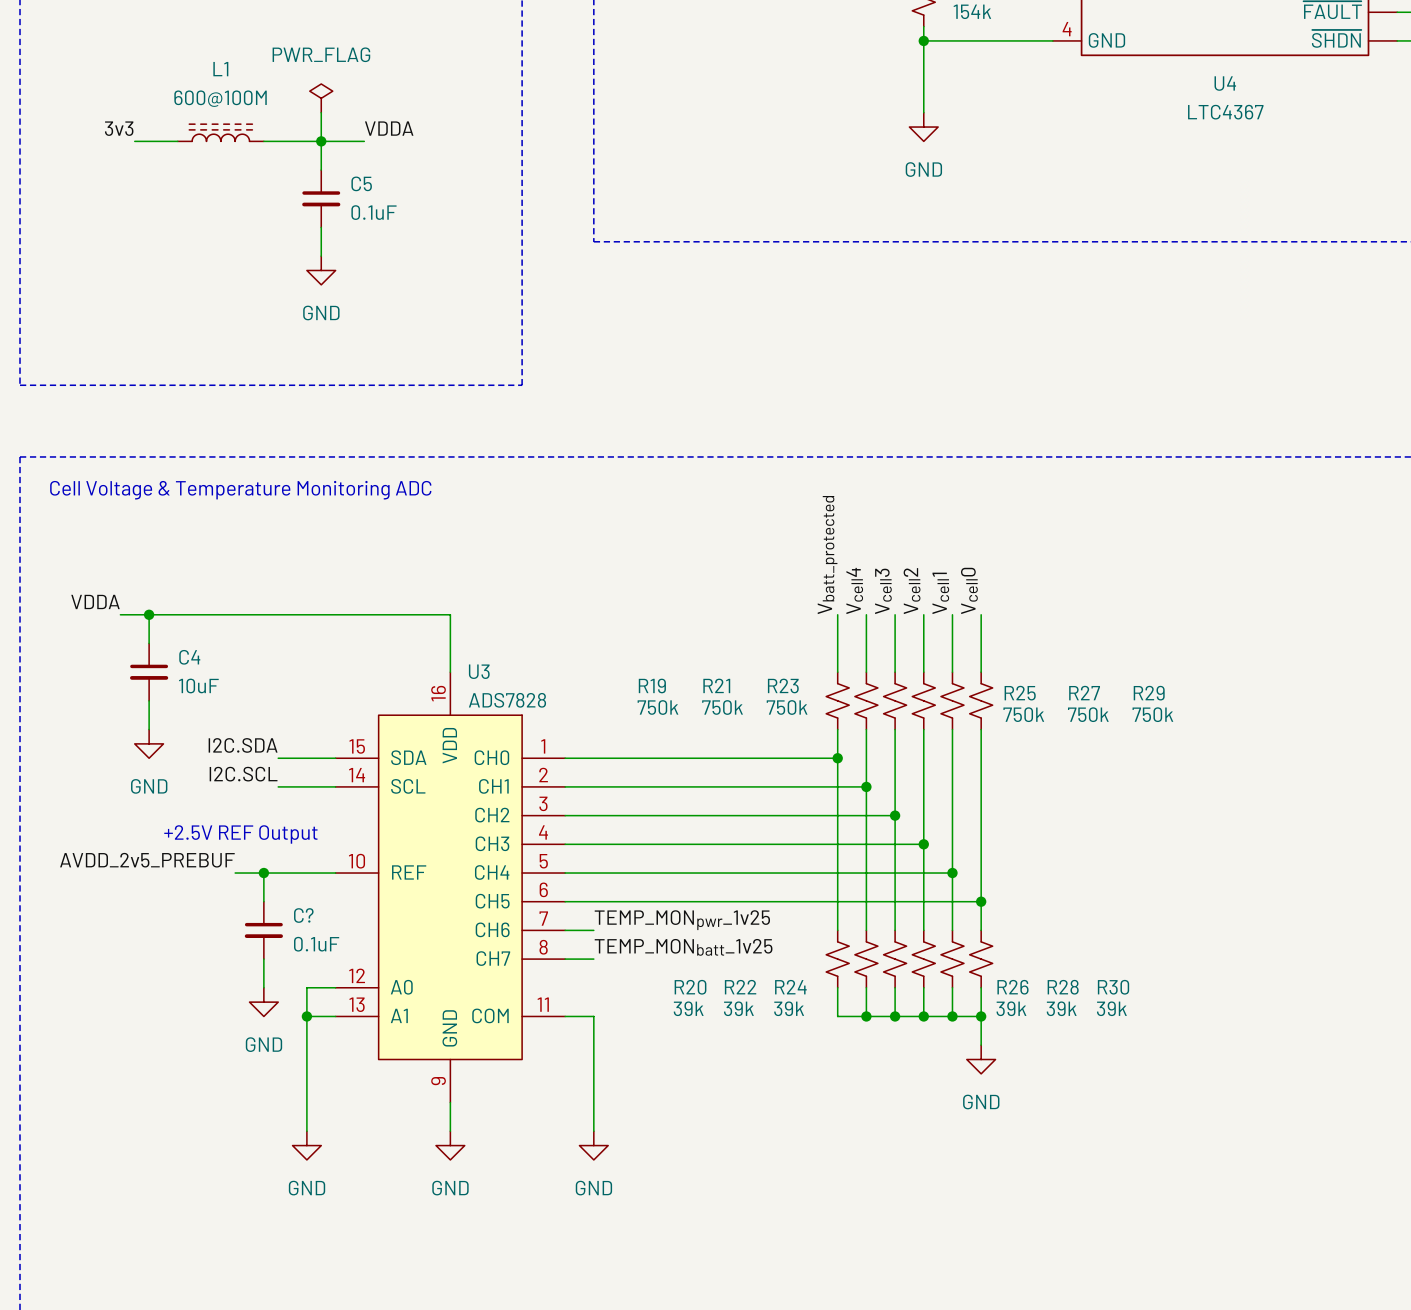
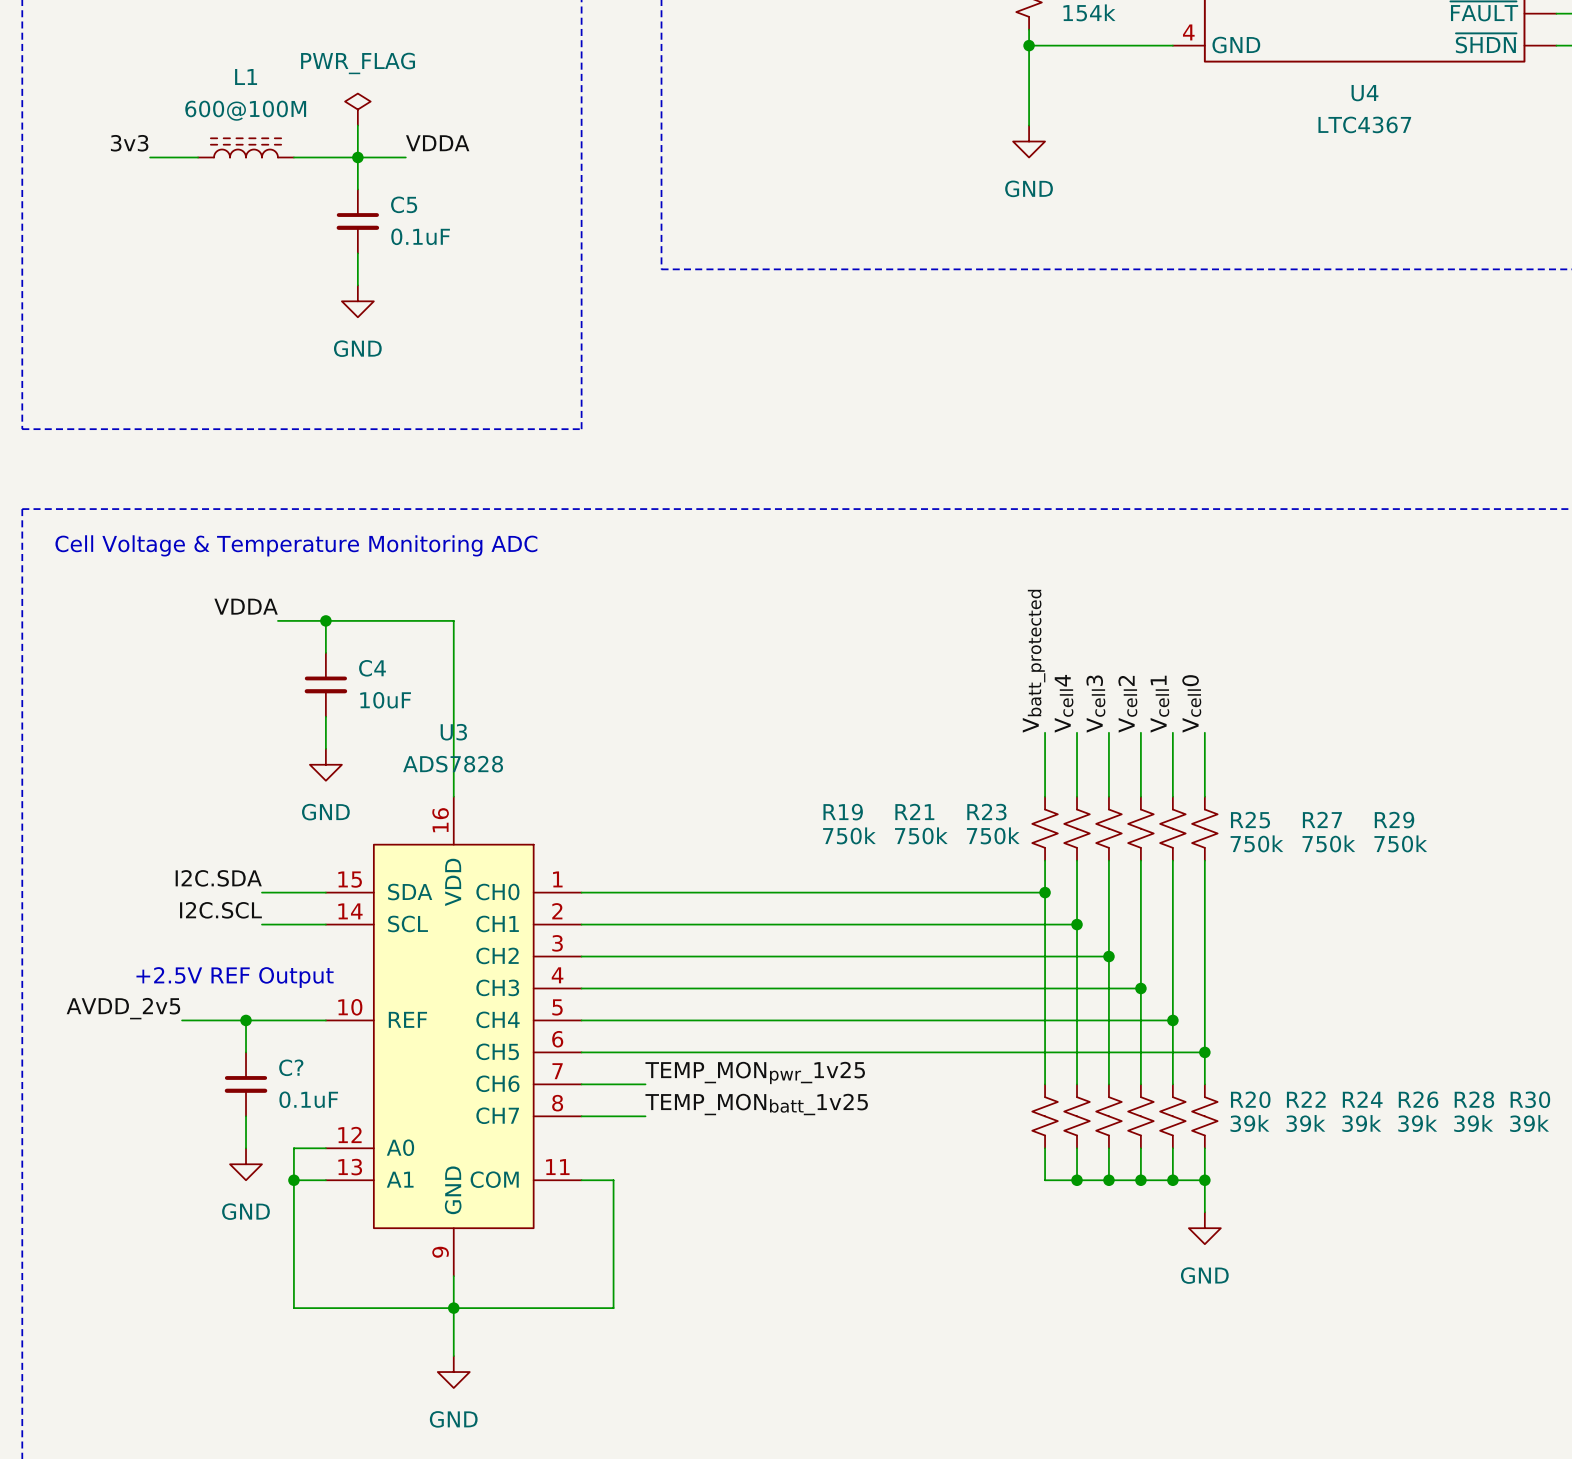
label position: Vbatt_protected (827, 555) -> Vbatt_protected (1034, 661)
wire: none -> (277, 620) (453, 620) (453, 796)
junction: none -> (325, 620)
label position: Vcell4 (854, 590) -> Vcell4 (1064, 703)
label position: Vcell0 (969, 590) -> Vcell0 (1191, 703)
label position: Vcell3 (883, 591) -> Vcell3 (1095, 704)
label position: Vcell2 (912, 591) -> Vcell2 (1127, 704)
label position: Vcell1 (940, 593) -> Vcell1 (1159, 704)
label position: VDDA (95, 601) -> VDDA (246, 606)
wire: (120, 614) (450, 614) (450, 672) -> none
wire: (149, 614) (149, 643) -> (325, 620) (325, 652)
junction: (149, 614) -> none
wire: (837, 614) (837, 672) -> (1045, 732) (1045, 796)
wire: (866, 614) (866, 672) -> (1077, 732) (1077, 796)
wire: (895, 614) (895, 672) -> (1108, 732) (1108, 796)
wire: (923, 614) (923, 672) -> (1140, 732) (1140, 796)
wire: (952, 614) (952, 672) -> (1172, 732) (1172, 796)
wire: (981, 614) (981, 672) -> (1204, 732) (1204, 796)
U3 name position: U3 (479, 671) -> U3 (453, 732)
C4 position: (149, 672) -> (325, 684)
wire: (149, 700) (149, 729) -> (325, 716) (325, 748)
U3 value position: ADS7828 (507, 700) -> ADS7828 (453, 764)
R19 position: (837, 700) -> (1045, 828)
R21 position: (866, 700) -> (1077, 828)
R23 position: (895, 700) -> (1108, 828)
R25 position: (923, 700) -> (1140, 828)
R27 position: (952, 700) -> (1172, 828)
R29 position: (981, 700) -> (1204, 828)
wire: (837, 729) (837, 930) -> (1045, 860) (1045, 1084)
wire: (866, 729) (866, 930) -> (1077, 860) (1077, 1084)
wire: (895, 729) (895, 930) -> (1108, 860) (1108, 1084)
wire: (923, 729) (923, 930) -> (1140, 860) (1140, 1084)
wire: (952, 729) (952, 930) -> (1172, 860) (1172, 1084)
wire: (981, 729) (981, 930) -> (1204, 860) (1204, 1084)
power symbol position: GND (149, 743) -> GND (325, 764)
label position: I2C.SDA (243, 745) -> I2C.SDA (218, 878)
wire: (278, 758) (335, 758) -> (261, 892) (325, 892)
wire: (565, 758) (837, 758) -> none
junction: (837, 758) -> none
label position: I2C.SCL (243, 774) -> I2C.SCL (220, 910)
wire: (278, 786) (335, 786) -> (261, 924) (325, 924)
wire: (565, 786) (866, 786) -> none
junction: (866, 786) -> none
junction: none -> (1045, 892)
wire: (565, 815) (895, 815) -> none
junction: (895, 815) -> none
wire: none -> (581, 924) (1077, 924)
junction: none -> (1077, 924)
text position: +2.5V REF Output (240, 834) -> +2.5V REF Output (235, 977)
wire: (565, 844) (923, 844) -> none
junction: (923, 844) -> none
wire: none -> (581, 956) (1108, 956)
junction: none -> (1108, 956)
label: AVDD_2v5_PREBUF (147, 860) -> none
wire: (235, 873) (335, 873) -> none
wire: (263, 873) (263, 901) -> (246, 1020) (246, 1052)
junction position: (263, 873) -> (246, 1020)
wire: (565, 873) (952, 873) -> none
junction: (952, 873) -> none
U3 position: (450, 887) -> (453, 1036)
wire: none -> (581, 988) (1140, 988)
junction: none -> (1140, 988)
wire: (565, 901) (981, 901) -> (581, 892) (1045, 892)
junction: (981, 901) -> none
label: none -> AVDD_2v5 (123, 1008)
wire: none -> (182, 1020) (325, 1020)
wire: none -> (581, 1020) (1172, 1020)
junction: none -> (1172, 1020)
label position: TEMP_MONpwr_1v25 (682, 920) -> TEMP_MONpwr_1v25 (755, 1072)
C? position: (263, 930) -> (246, 1084)
wire: (565, 930) (593, 930) -> none
wire: none -> (581, 1052) (1204, 1052)
junction: none -> (1204, 1052)
label position: TEMP_MONbatt_1v25 (683, 947) -> TEMP_MONbatt_1v25 (756, 1104)
wire: (263, 959) (263, 987) -> (246, 1116) (246, 1148)
wire: (565, 959) (593, 959) -> none
R20 position: (837, 959) -> (1045, 1116)
R22 position: (866, 959) -> (1077, 1116)
R24 position: (895, 959) -> (1108, 1116)
R26 position: (923, 959) -> (1140, 1116)
R28 position: (952, 959) -> (1172, 1116)
R30 position: (981, 959) -> (1204, 1116)
wire: none -> (581, 1084) (645, 1084)
wire: (335, 987) (306, 987) (306, 1131) -> none
R20 name position: R20 (690, 987) -> R20 (1250, 1099)
R22 name position: R22 (740, 987) -> R22 (1306, 1099)
R24 name position: R24 (790, 987) -> R24 (1362, 1099)
wire: (837, 987) (837, 1016) (981, 1016) -> (1045, 1148) (1045, 1180) (1204, 1180)
wire: (866, 987) (866, 1016) -> (1077, 1148) (1077, 1180)
wire: (895, 987) (895, 1016) -> (1108, 1148) (1108, 1180)
wire: (923, 987) (923, 1016) -> (1140, 1148) (1140, 1180)
wire: (952, 987) (952, 1016) -> (1172, 1148) (1172, 1180)
wire: (981, 987) (981, 1045) -> (1204, 1148) (1204, 1212)
R26 name position: R26 (1013, 987) -> R26 (1418, 1099)
R28 name position: R28 (1063, 987) -> R28 (1474, 1099)
R30 name position: R30 (1113, 987) -> R30 (1530, 1099)
power symbol position: GND (263, 1002) -> GND (246, 1164)
wire: none -> (581, 1116) (645, 1116)
R20 value position: 39k (688, 1008) -> 39k (1249, 1123)
R22 value position: 39k (738, 1008) -> 39k (1305, 1123)
R24 value position: 39k (789, 1008) -> 39k (1361, 1123)
R26 value position: 39k (1011, 1008) -> 39k (1417, 1123)
R28 value position: 39k (1061, 1008) -> 39k (1473, 1123)
R30 value position: 39k (1111, 1008) -> 39k (1529, 1123)
wire: (306, 1016) (335, 1016) -> (293, 1180) (325, 1180)
junction position: (306, 1016) -> (293, 1180)
wire: (565, 1016) (593, 1016) (593, 1131) -> none
junction: (866, 1016) -> none
junction: (895, 1016) -> none
junction: (923, 1016) -> none
junction: (952, 1016) -> none
junction: (981, 1016) -> none
wire: none -> (325, 1148) (293, 1148) (293, 1308) (613, 1308) (613, 1180) (581, 1180)
junction: none -> (1077, 1180)
power symbol position: GND (981, 1059) -> GND (1204, 1228)
junction: none -> (1108, 1180)
junction: none -> (1140, 1180)
junction: none -> (1172, 1180)
junction: none -> (1204, 1180)
wire: (450, 1102) (450, 1131) -> none
power symbol: GND (306, 1145) -> none
wire: none -> (453, 1276) (453, 1356)
power symbol: GND (450, 1145) -> none
power symbol: GND (593, 1145) -> none
junction: none -> (453, 1308)
power symbol: none -> GND (453, 1372)

